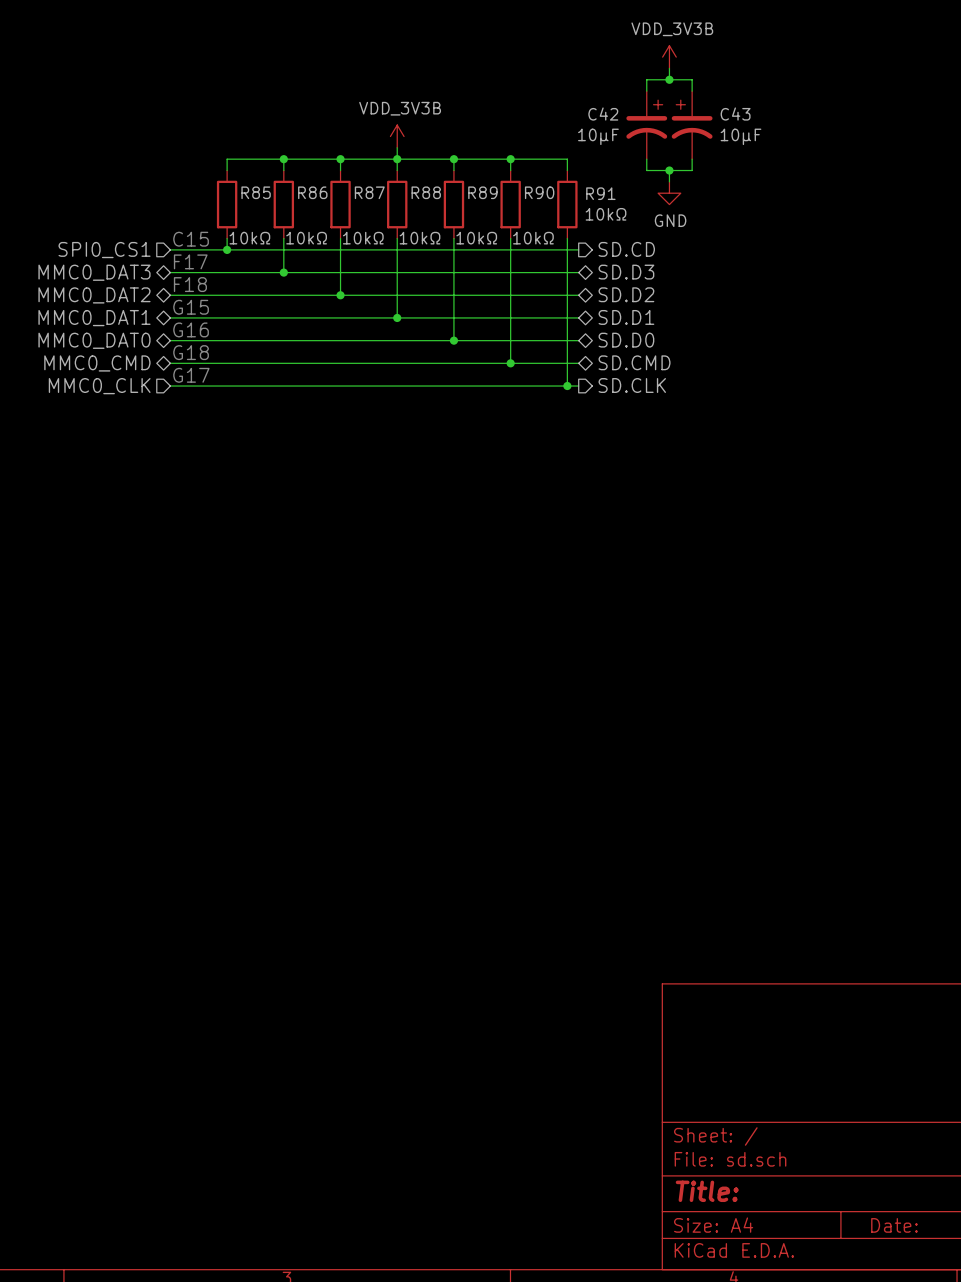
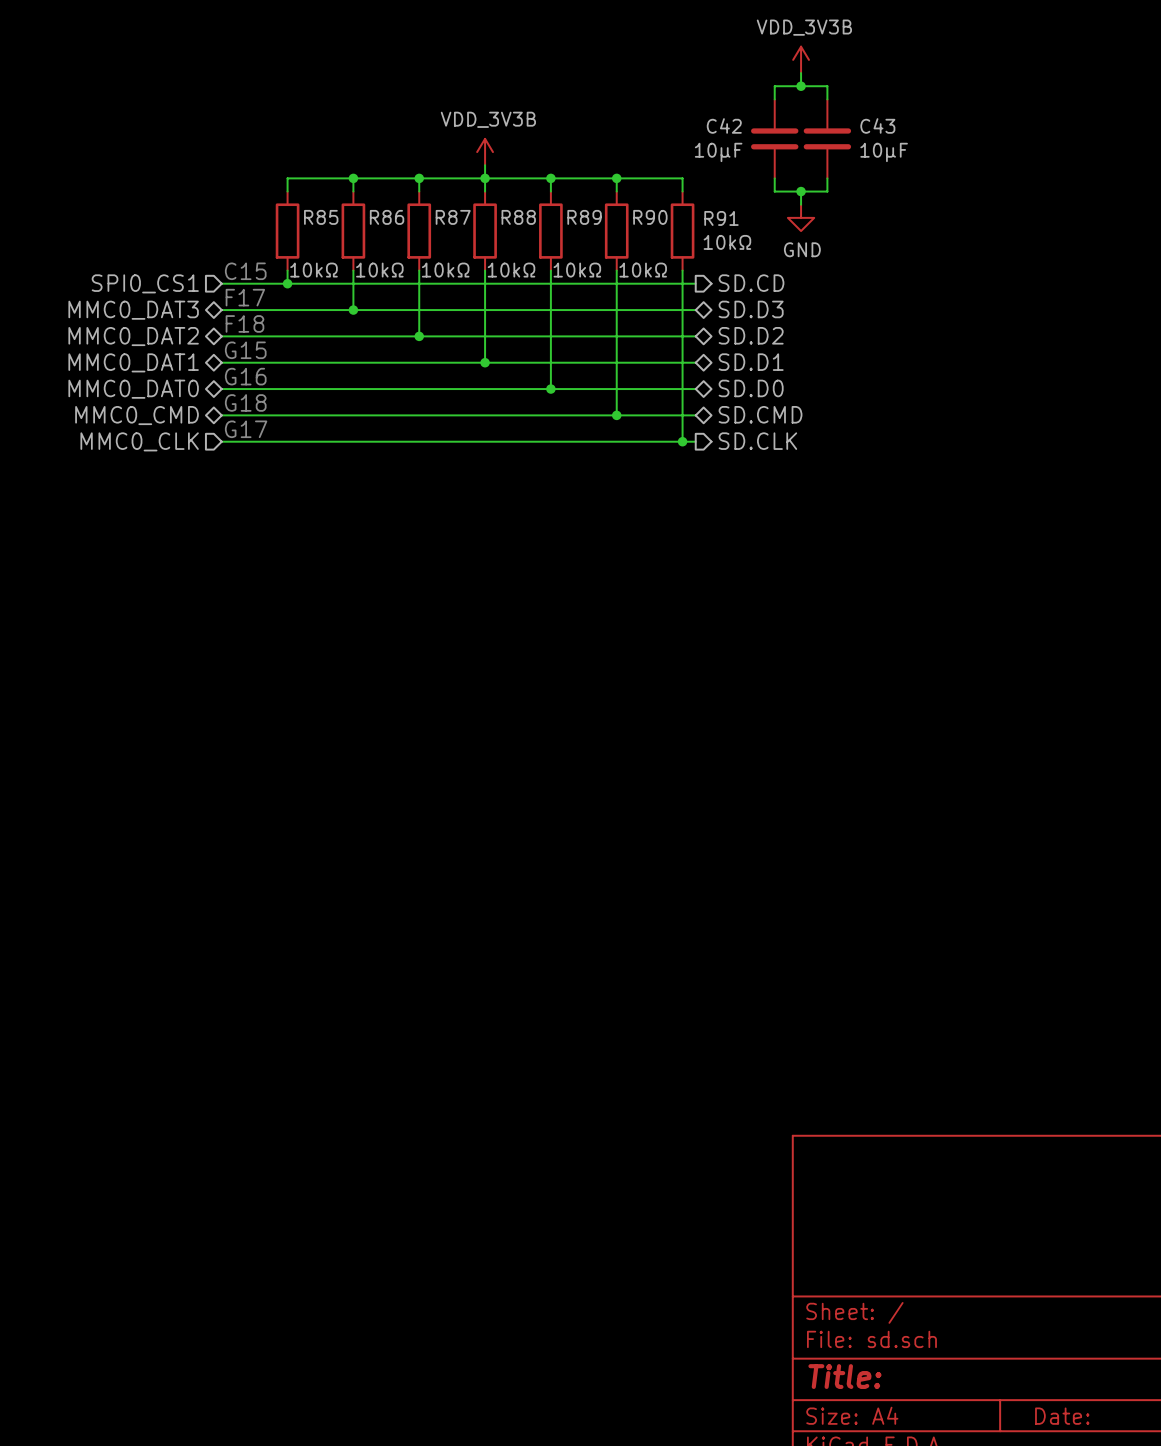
C42 symbol: [626, 91, 668, 160] -> [751, 99, 799, 179]
C43 symbol: [671, 91, 713, 160] -> [803, 99, 852, 179]

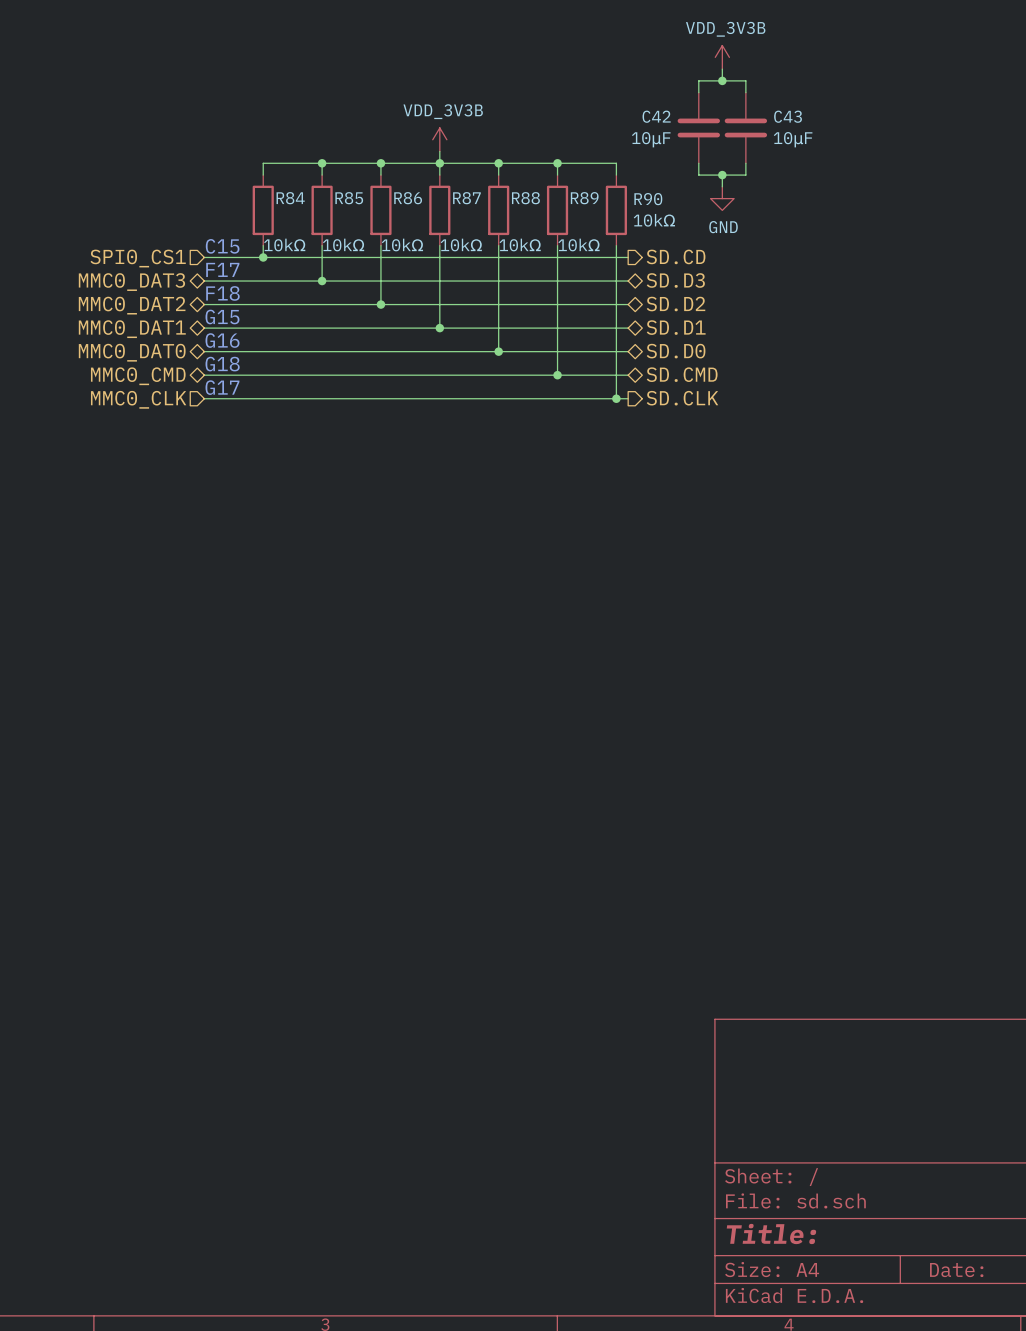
R85 name: R85 (321, 217) -> R84 (290, 198)
R86 name: R86 (387, 217) -> R85 (349, 198)
R87 name: R87 (453, 217) -> R86 (408, 198)
R88 name: R88 (518, 217) -> R87 (466, 198)
R89 name: R89 (584, 217) -> R88 (525, 198)
R90 name: R90 (650, 217) -> R89 (584, 198)
R91 name: R91 (721, 218) -> R90 (648, 199)

